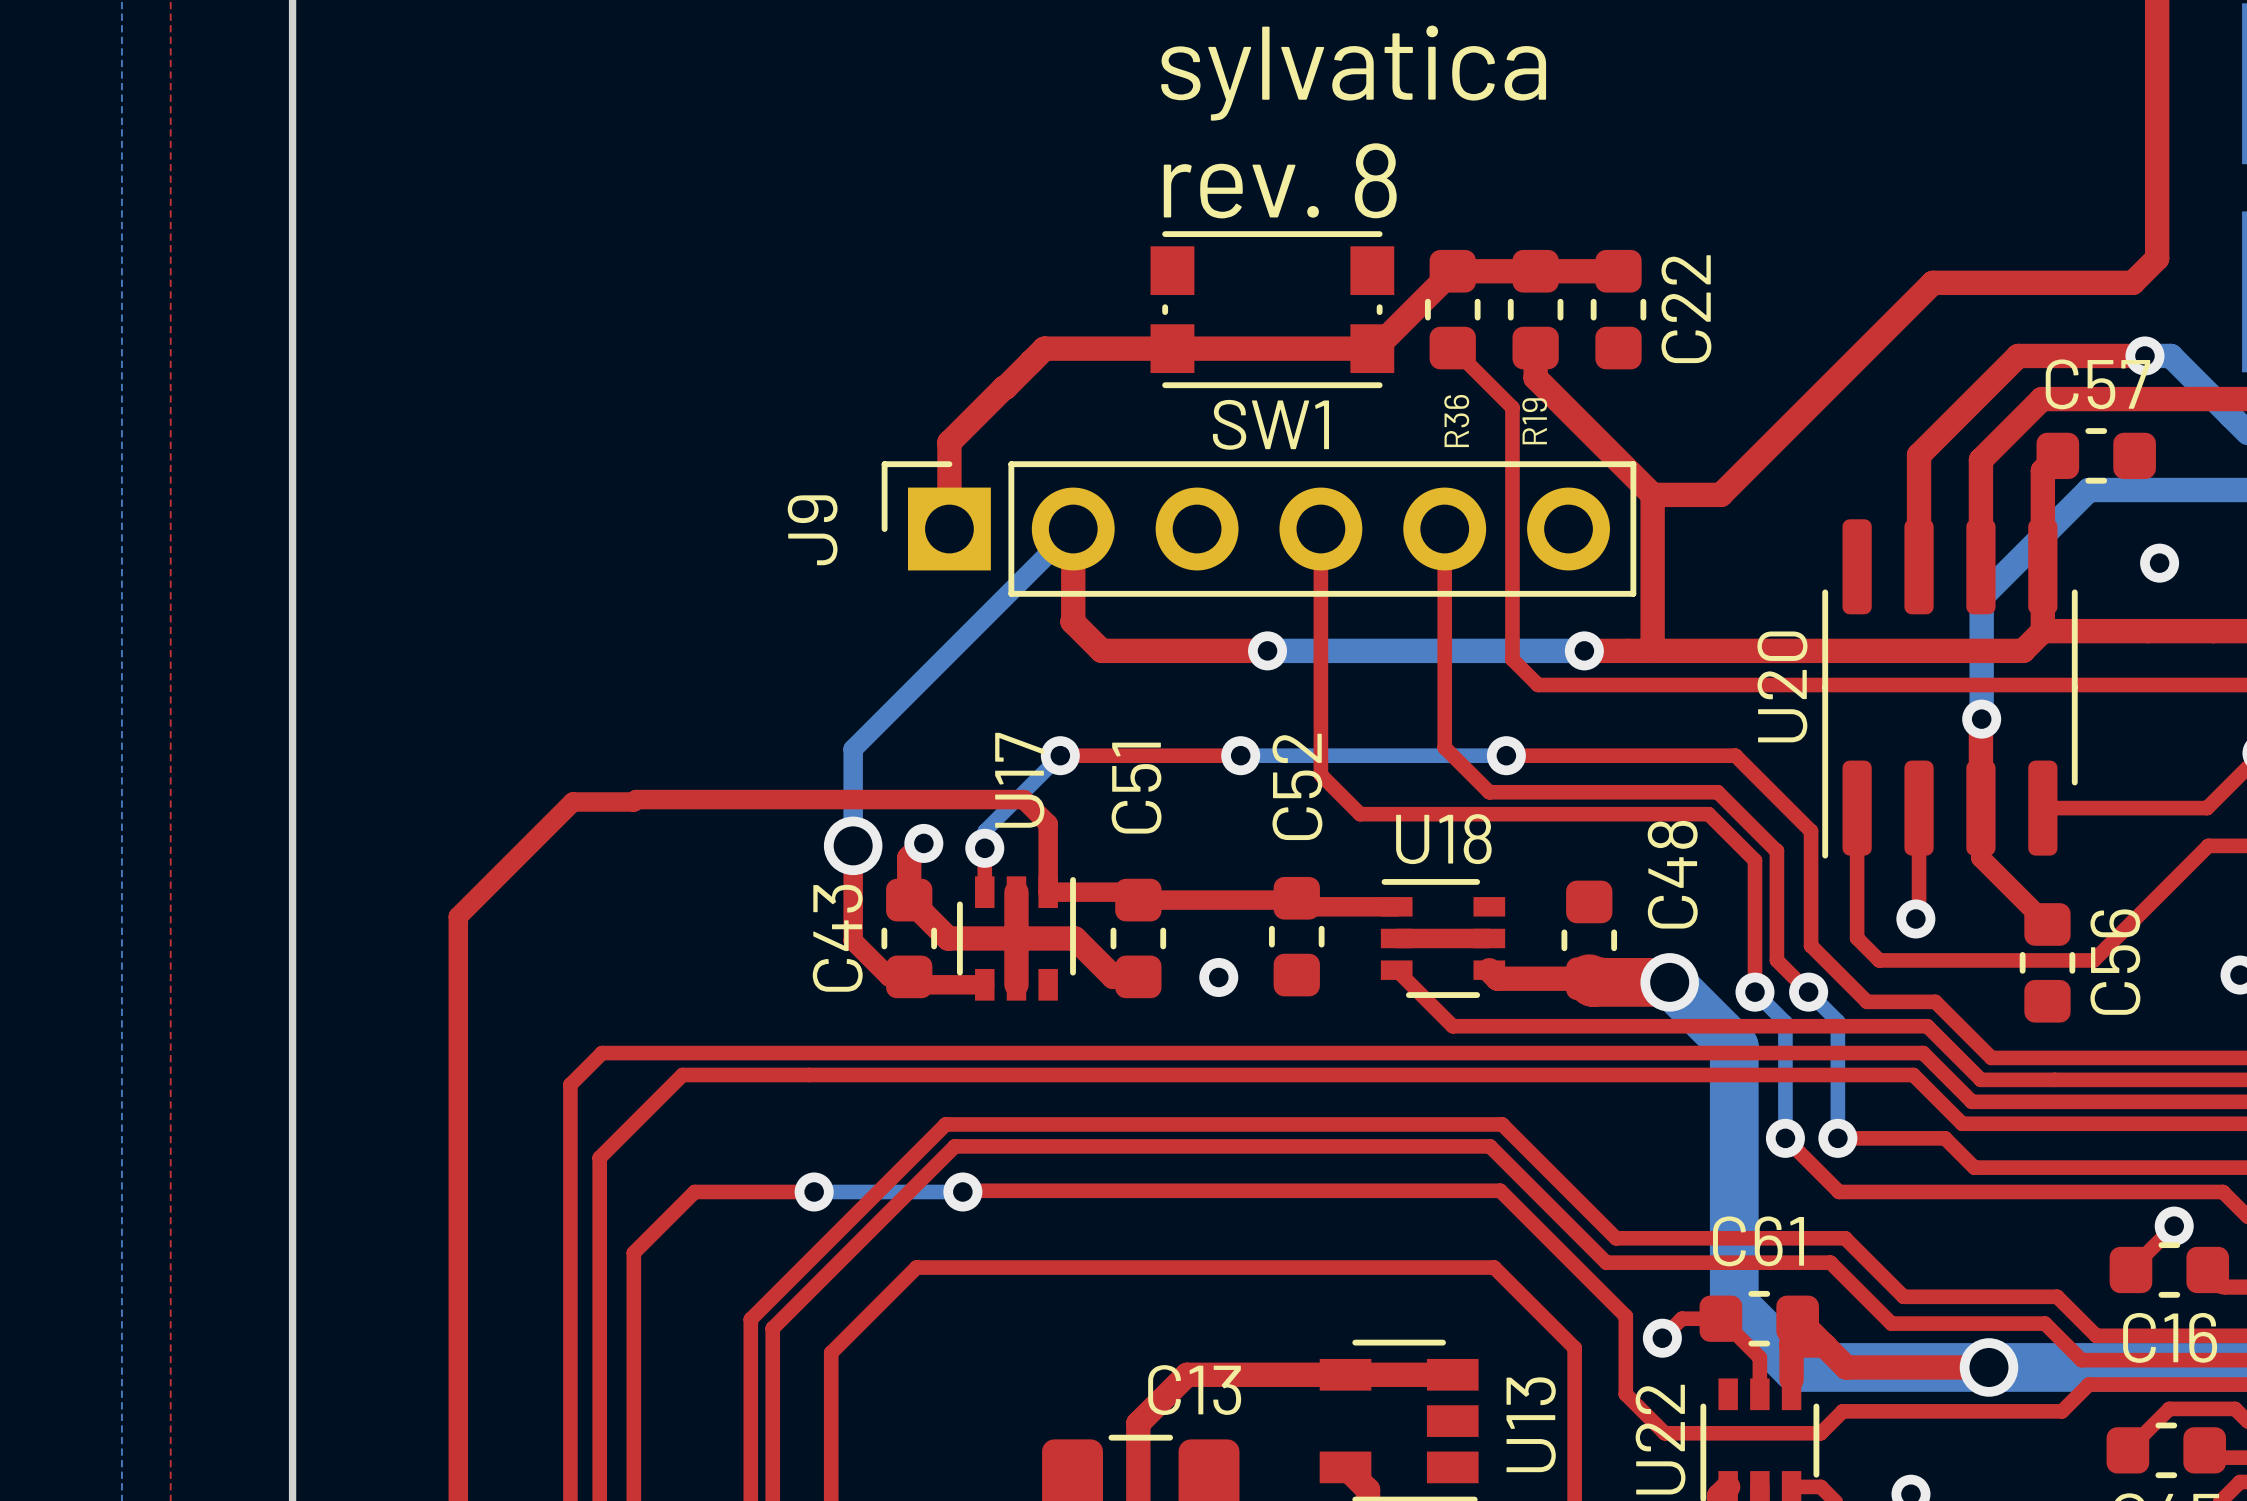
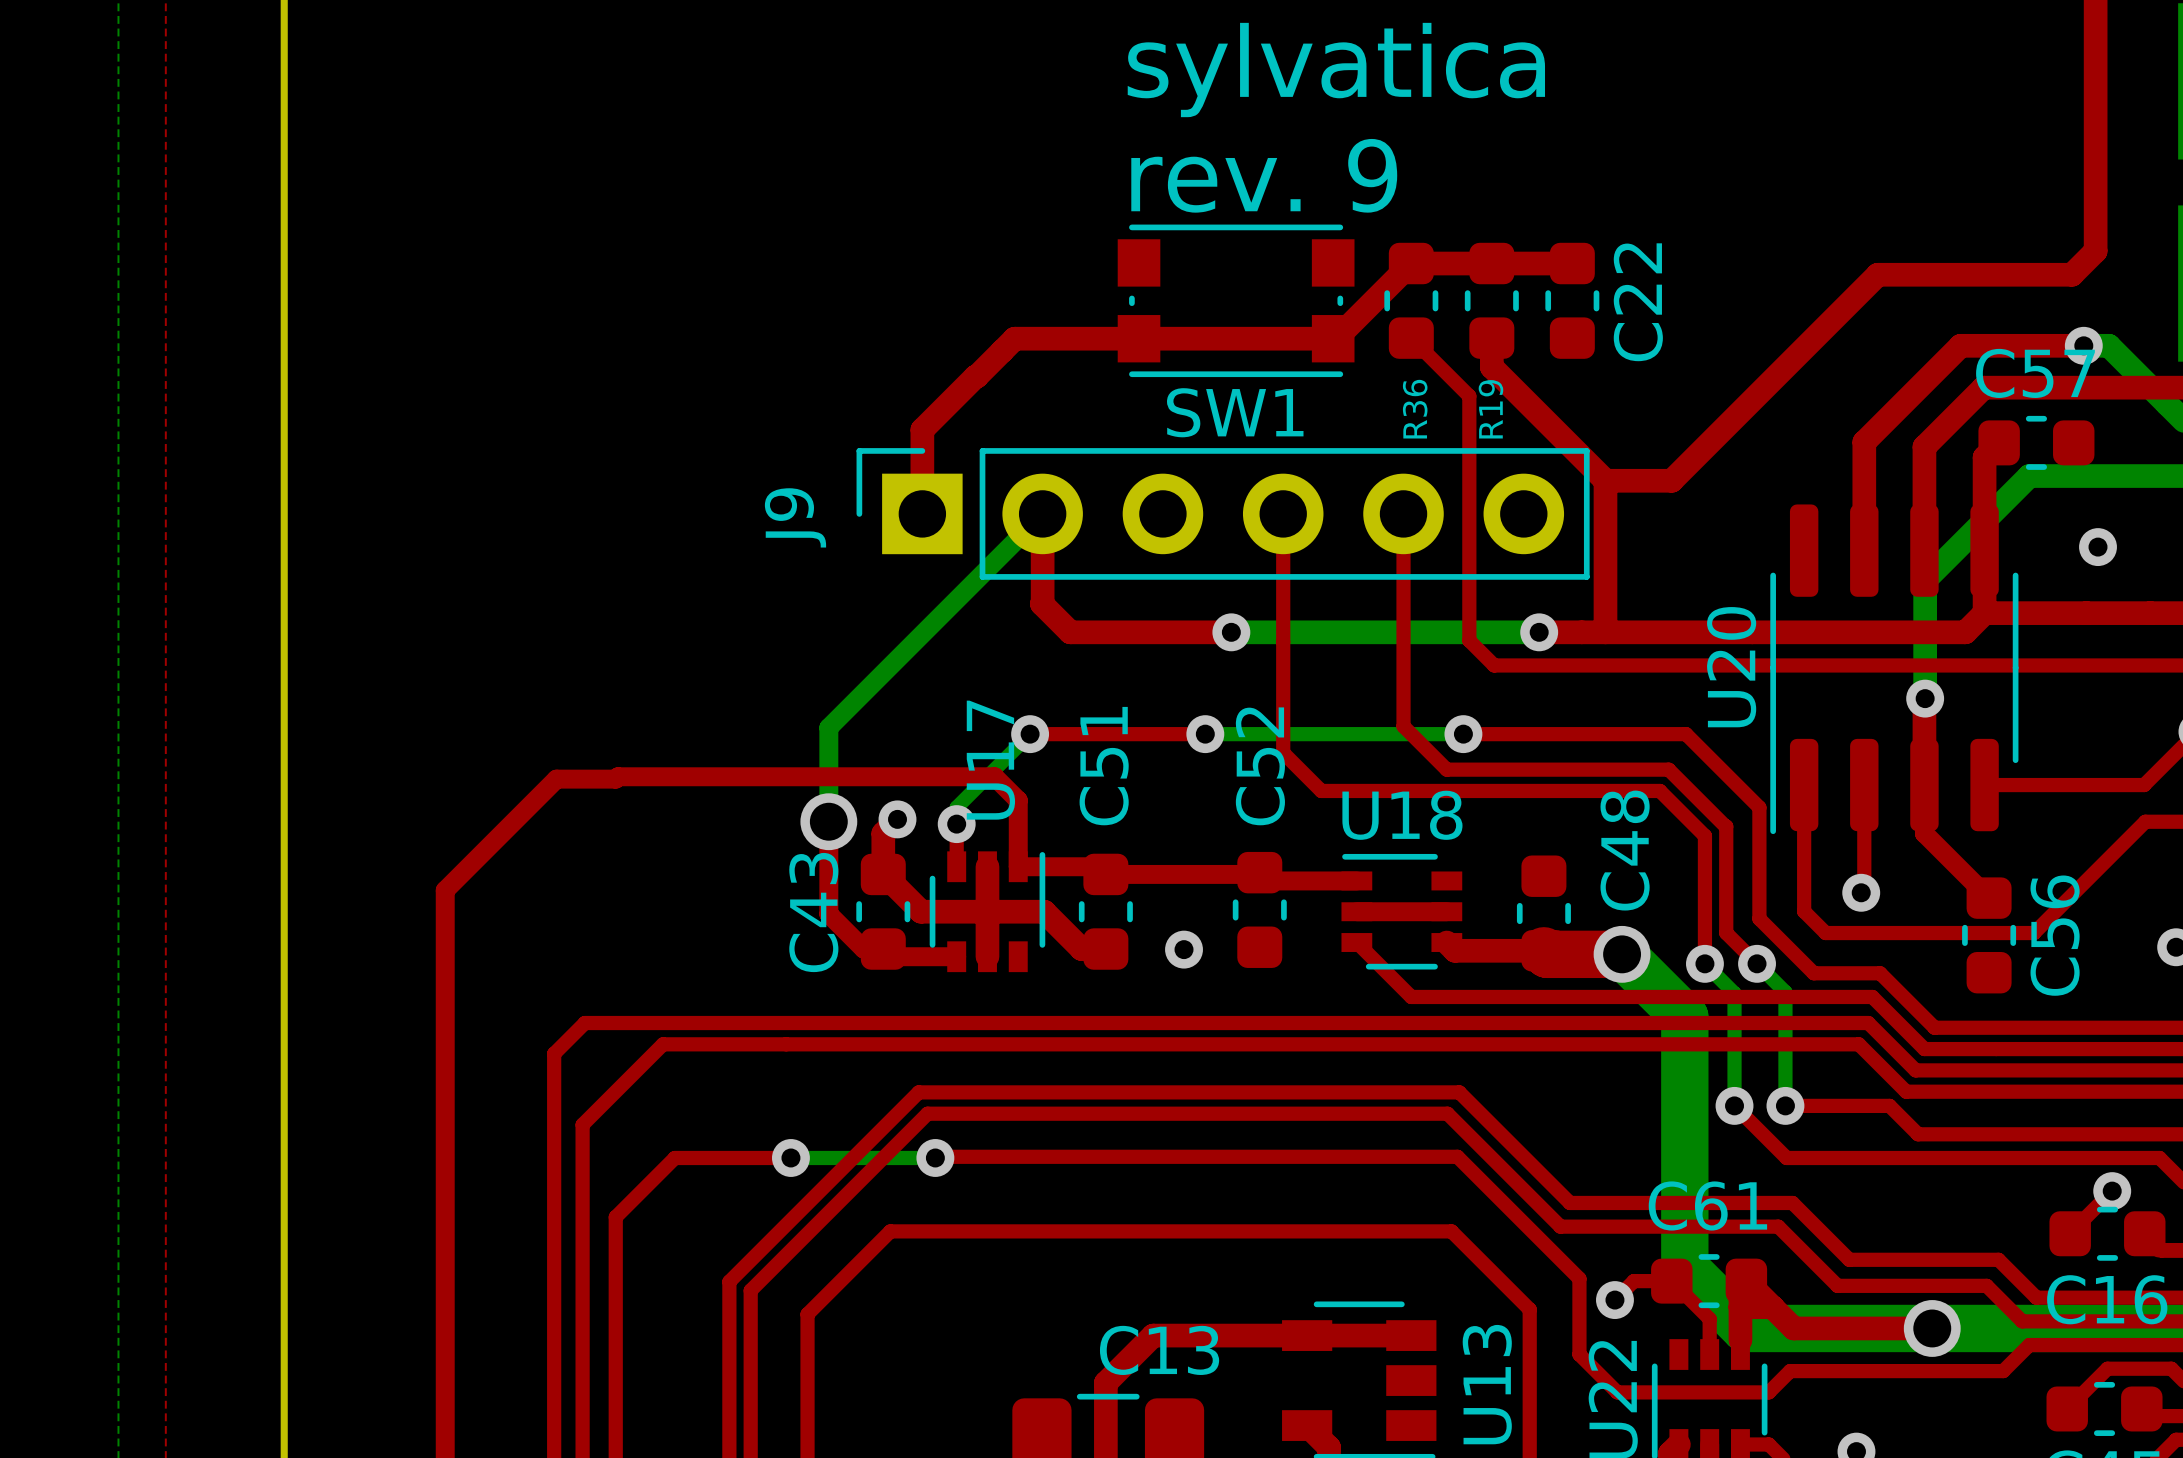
text: rev. 8 (1280, 180) -> rev. 9 (1264, 175)

